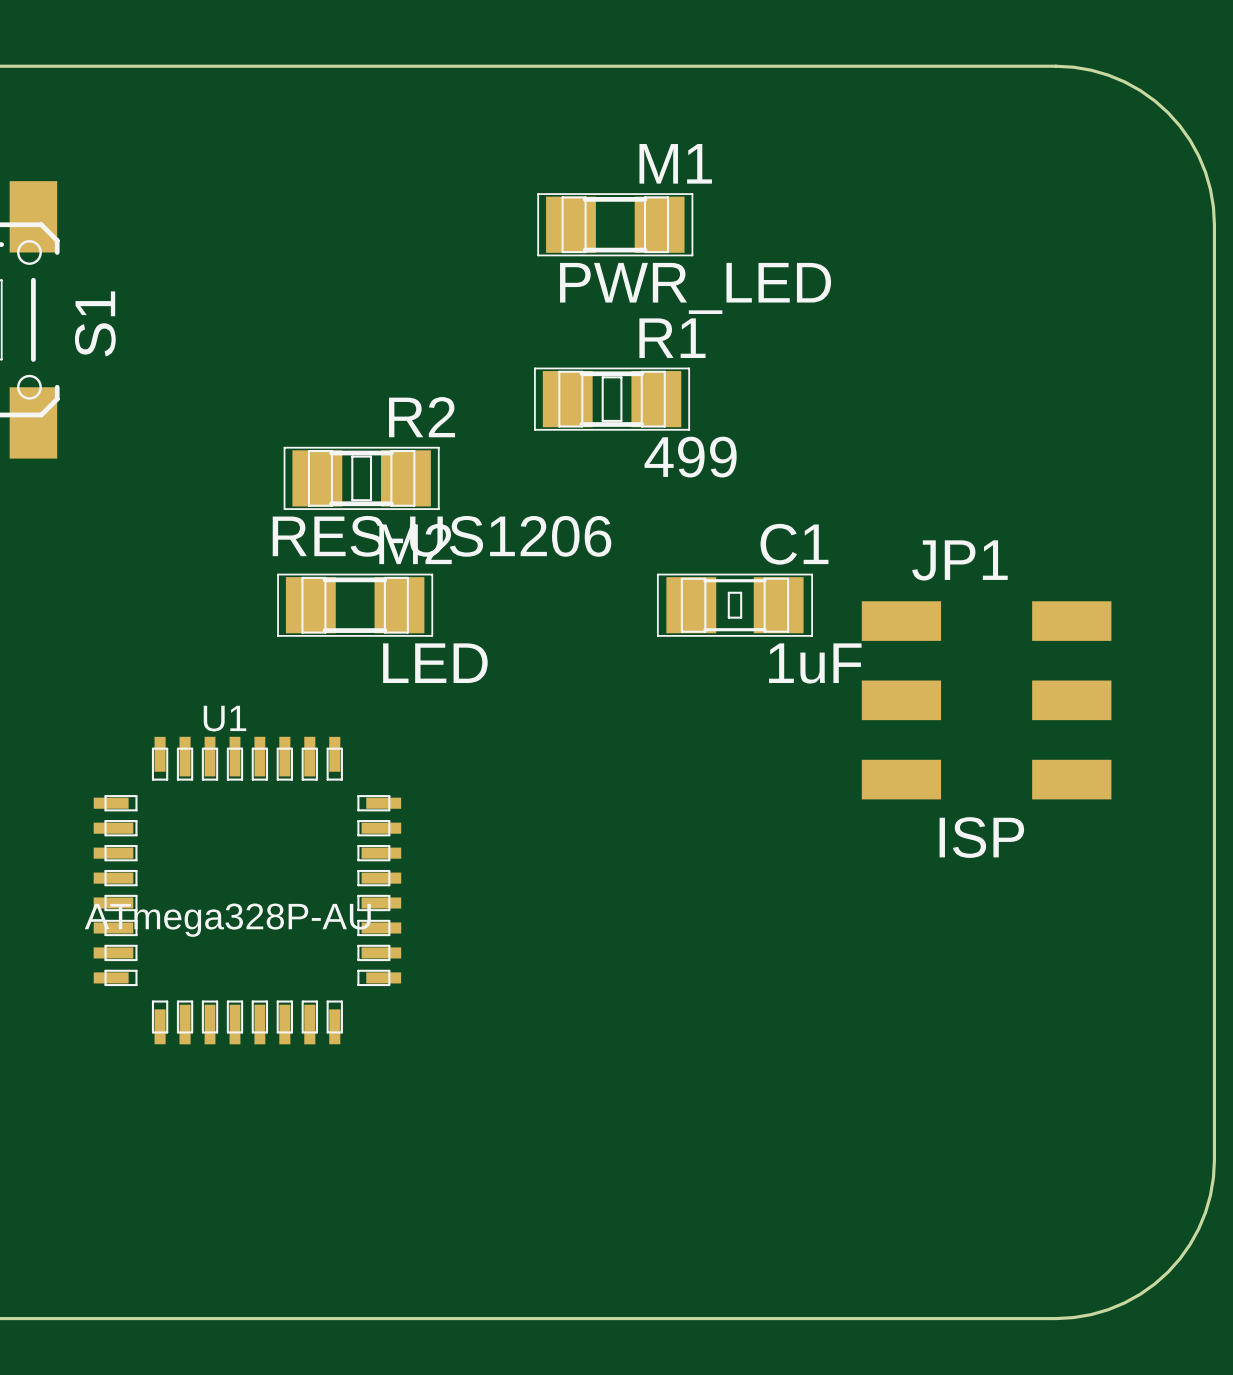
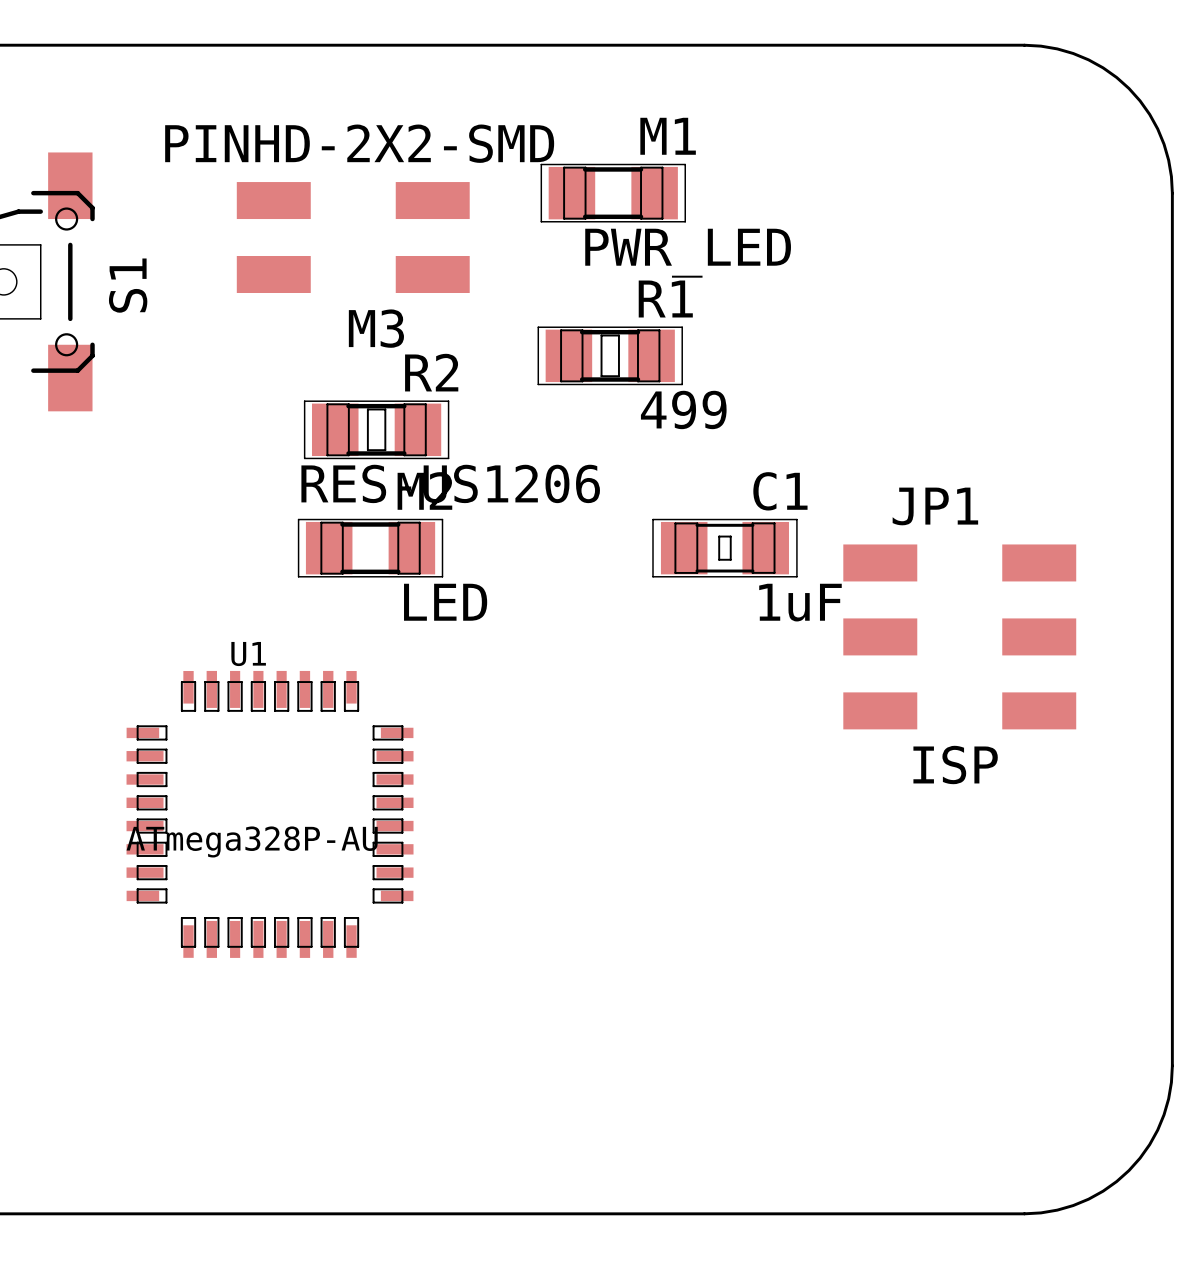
M3: none -> PINHD-2X2-SMD (353, 237)

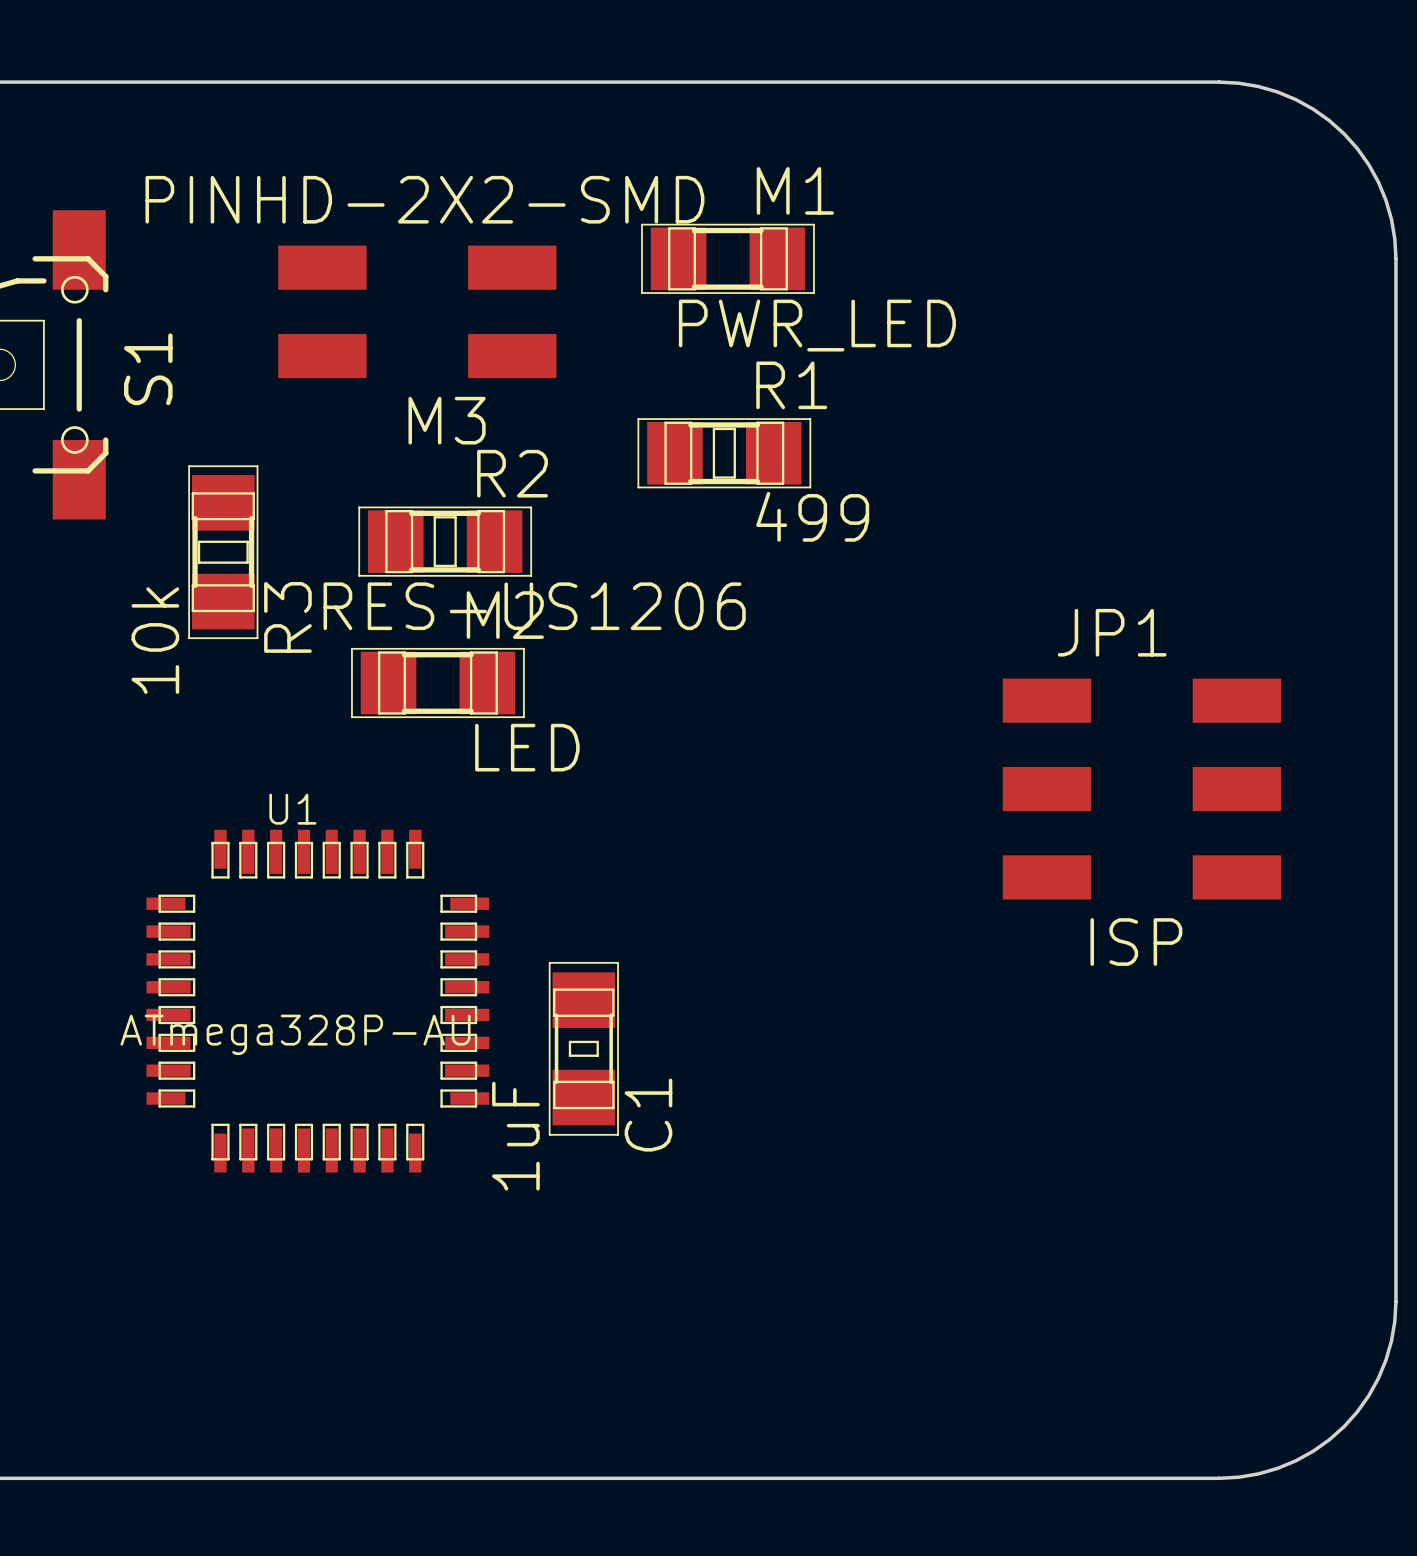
R3: none -> 10k (223, 552)
C1 rotation: 0° (724, 548) -> 90° clockwise (583, 1048)
C1 position: (724, 548) -> (583, 1048)

